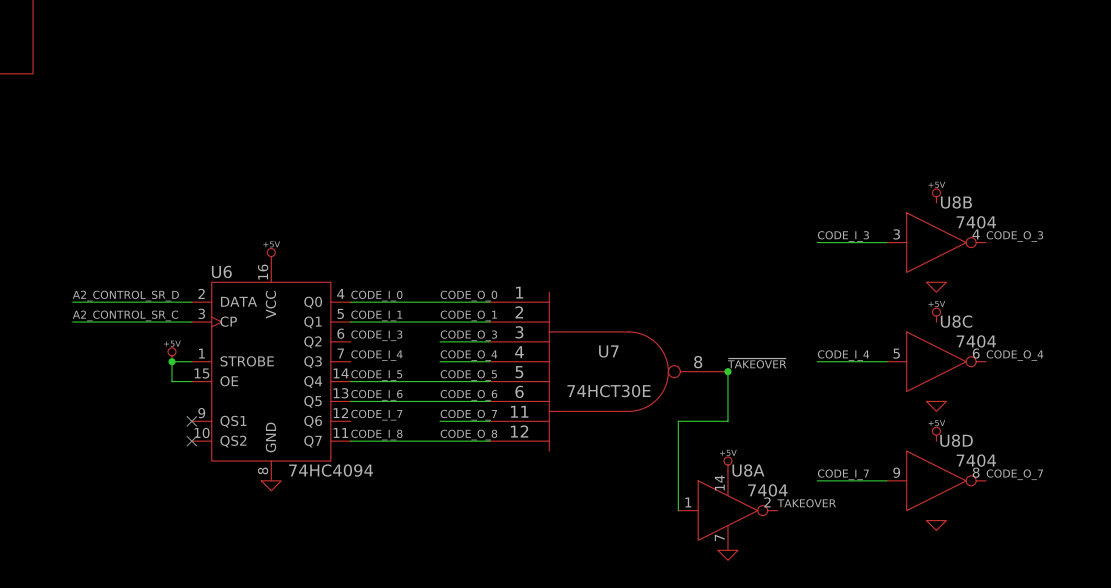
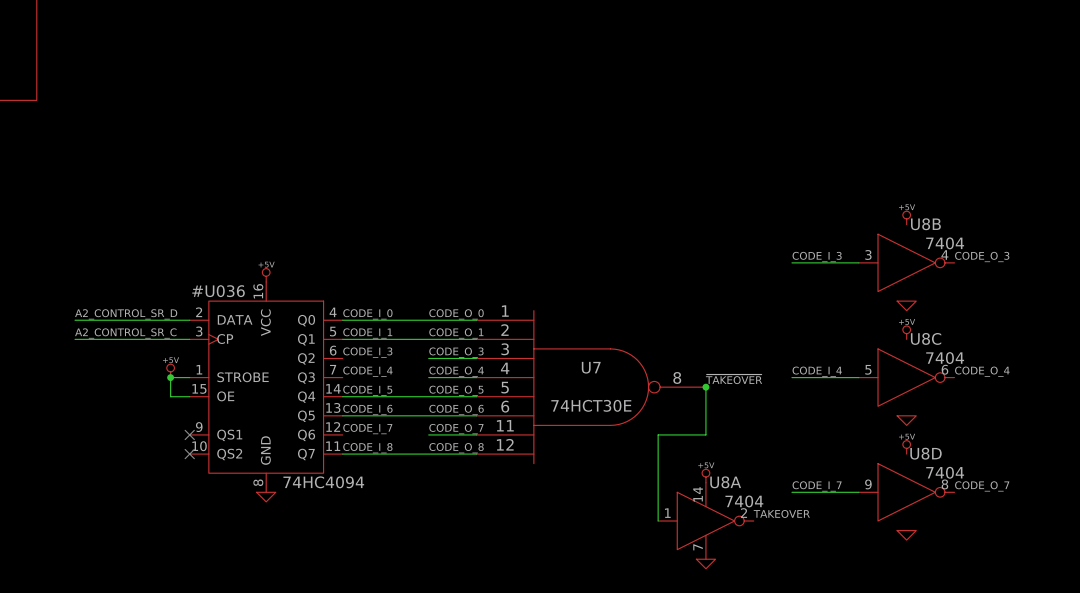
drawing: none -> [189, 282, 343, 493]
U6: 74HC4094 (271, 371) -> none

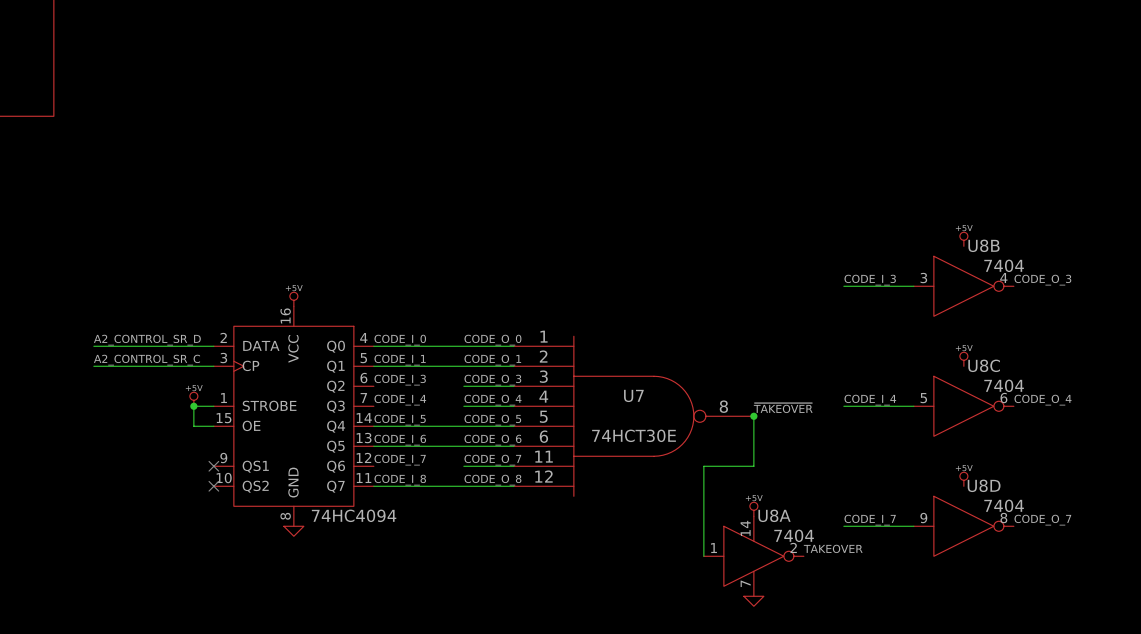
drawing shape: [189, 282, 365, 493] -> [213, 306, 397, 527]
power symbol: (906, 305) -> none
power symbol: (906, 420) -> none
power symbol: (906, 535) -> none

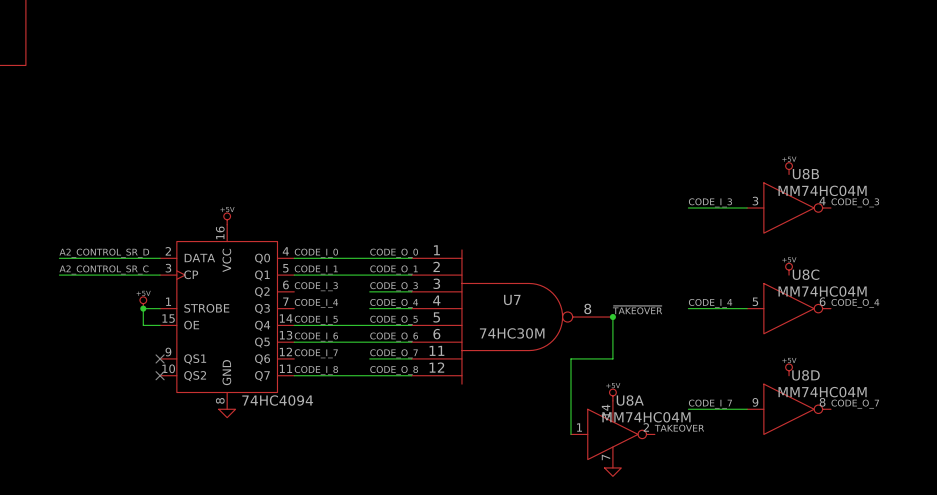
U8B value: 7404 (1004, 265) -> MM74HC04M (822, 190)
U8C value: 7404 (1004, 385) -> MM74HC04M (822, 291)
U7 value: 74HCT30E (634, 435) -> 74HC30M (512, 333)
U8D value: 7404 (1004, 505) -> MM74HC04M (822, 392)
U8A value: 7404 (794, 535) -> MM74HC04M (646, 417)

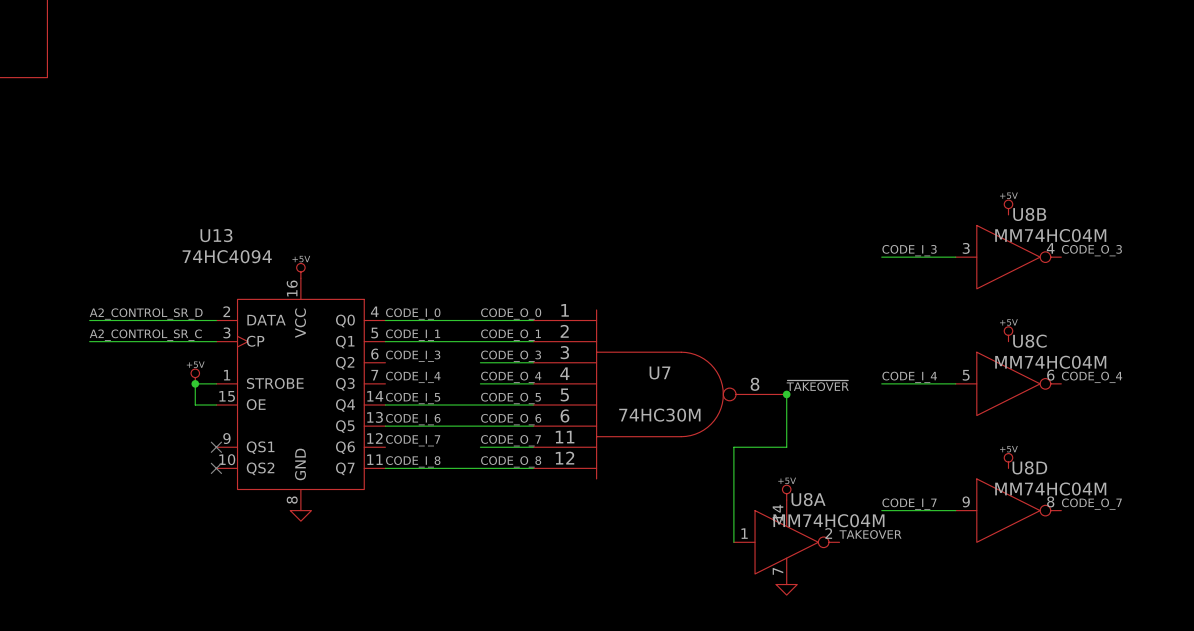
drawing: [160, 224, 295, 410] -> none
U13: none -> 74HC4094 (300, 394)

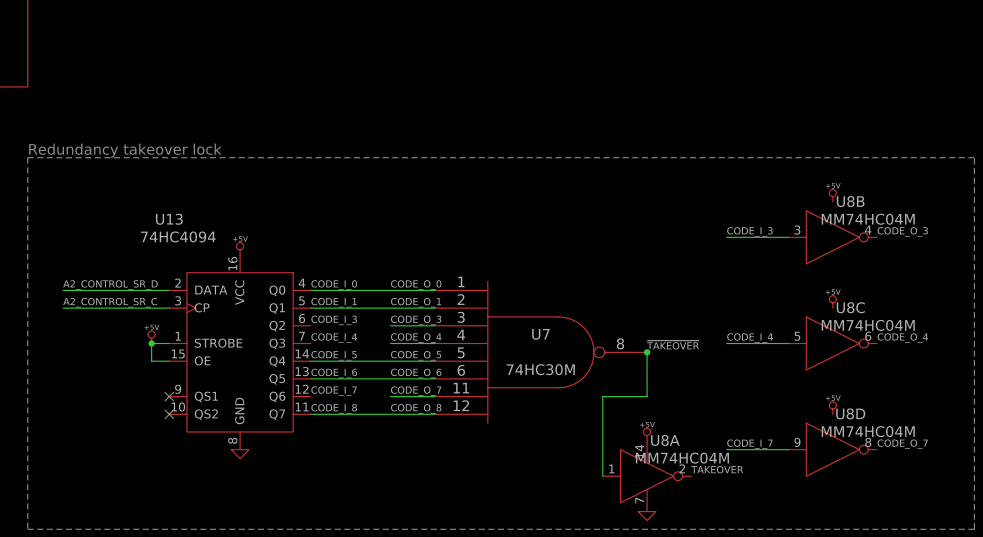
text: none -> Redundancy takeover lock (125, 150)
line: none -> (27, 157) (974, 157) (974, 529) (27, 529) (27, 157)

